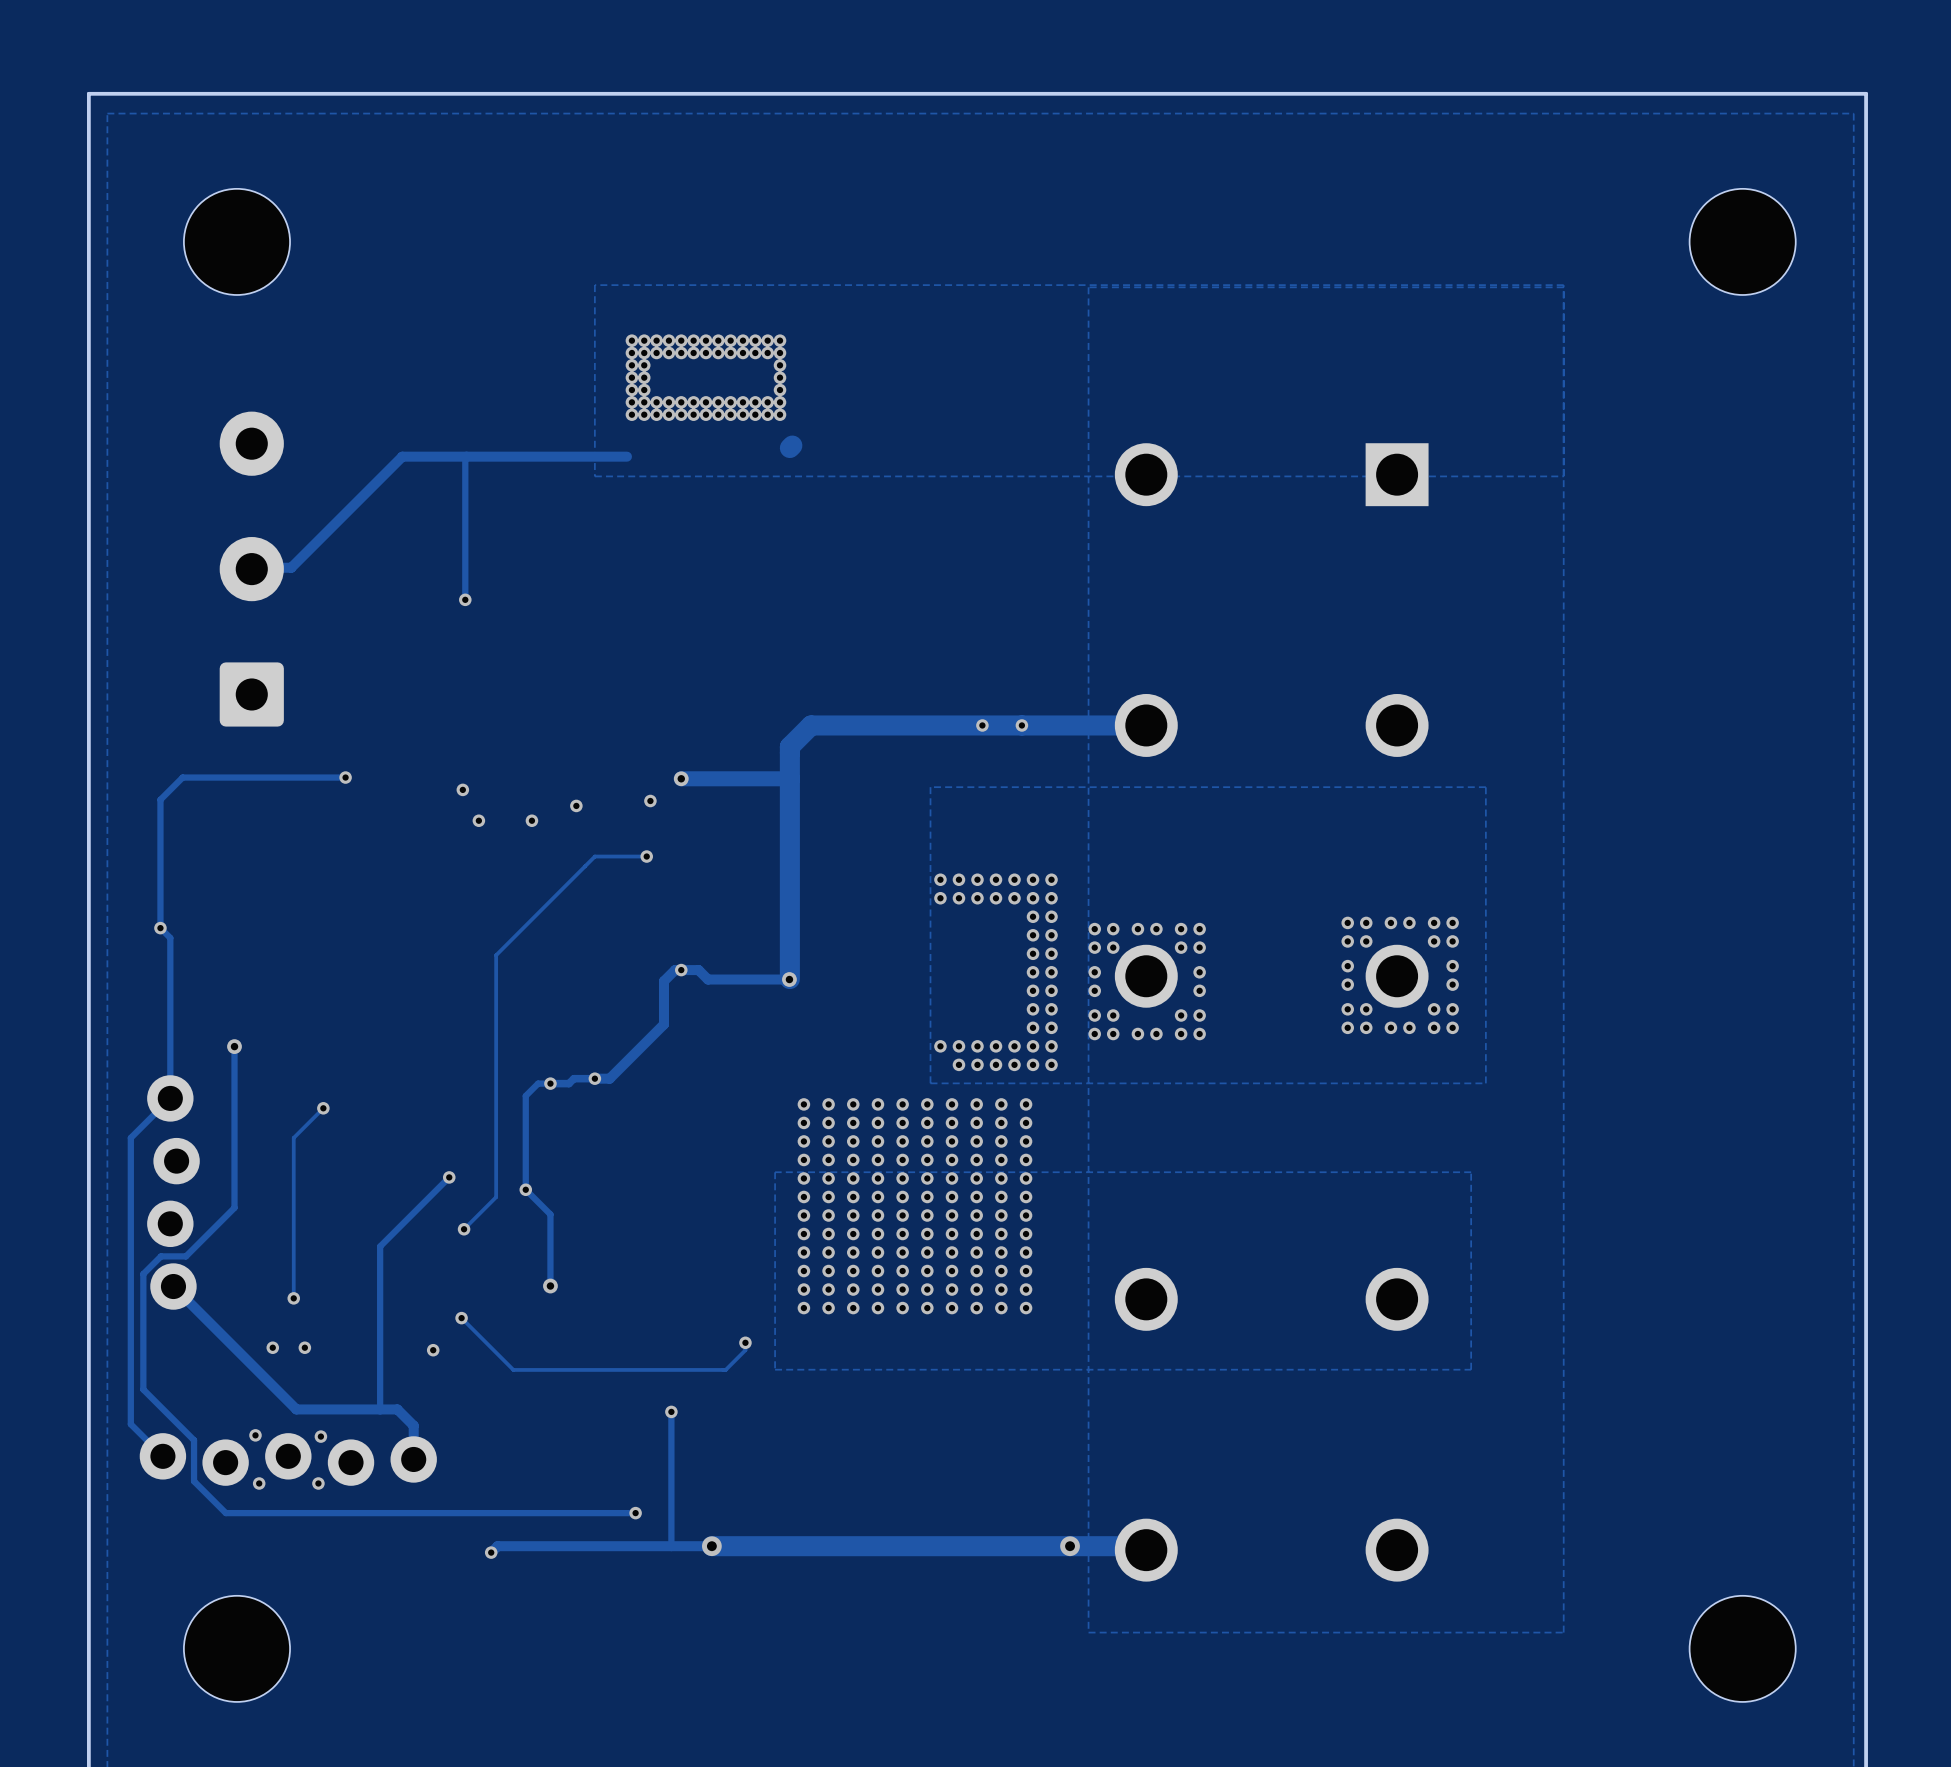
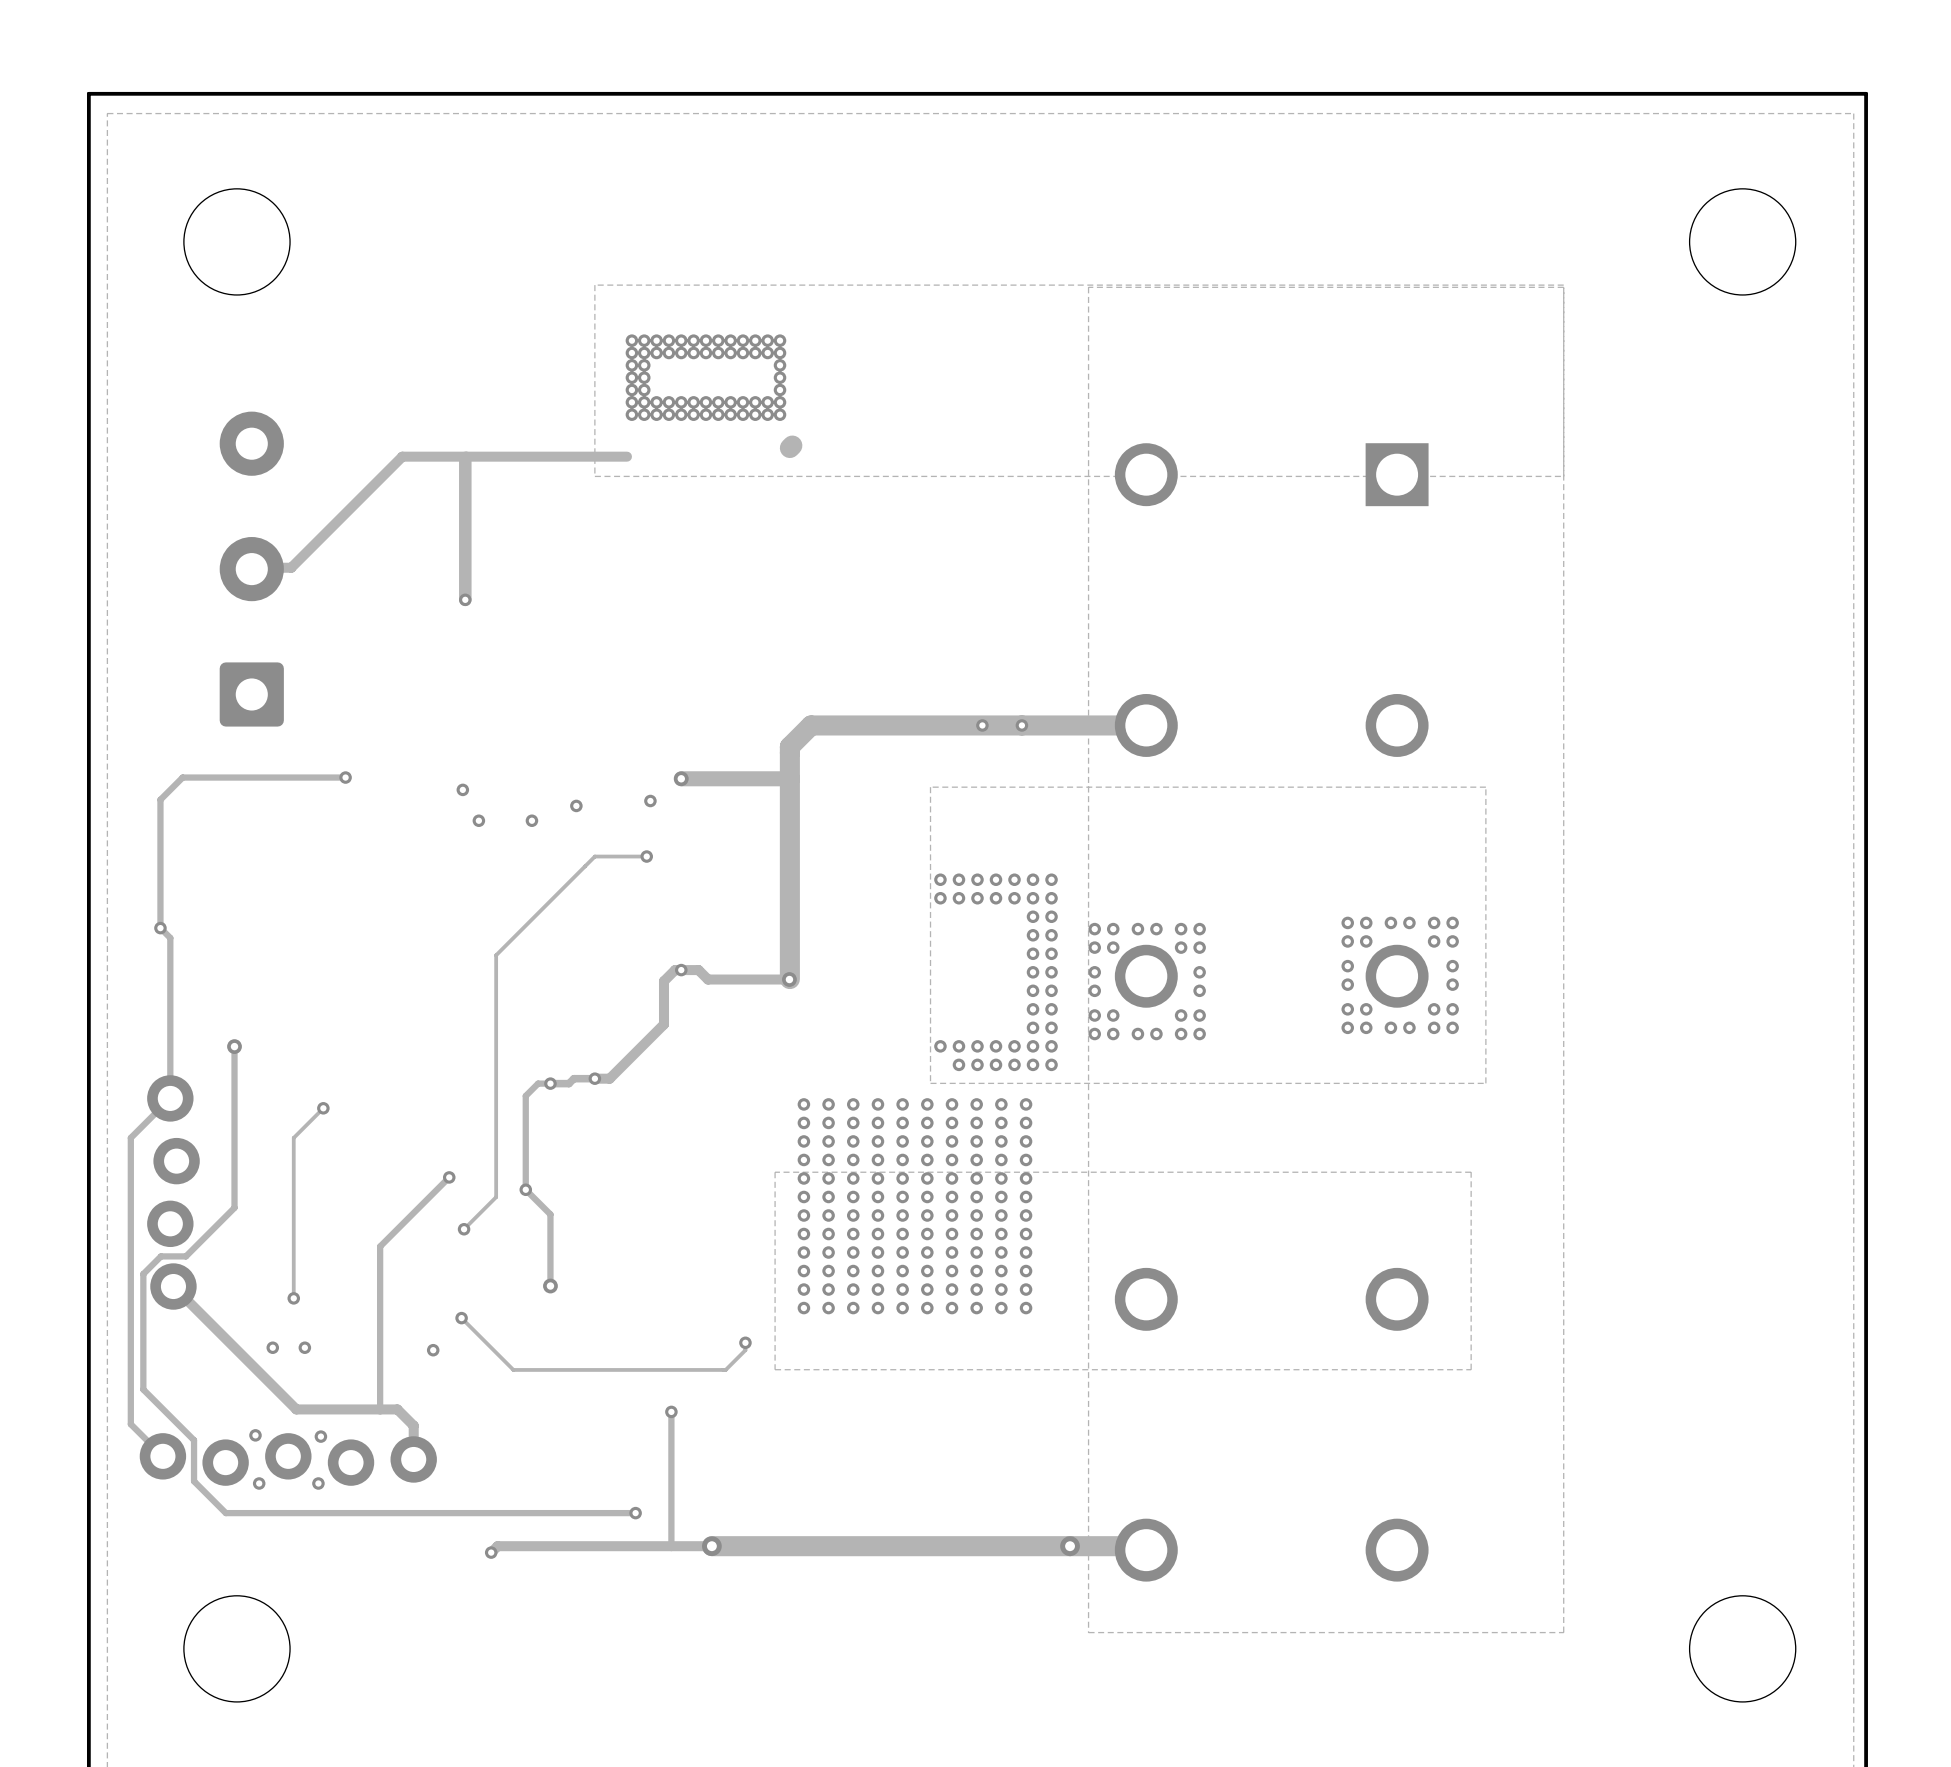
track width: thin (465, 457) (465, 599) -> thick (465, 457) (465, 599)

